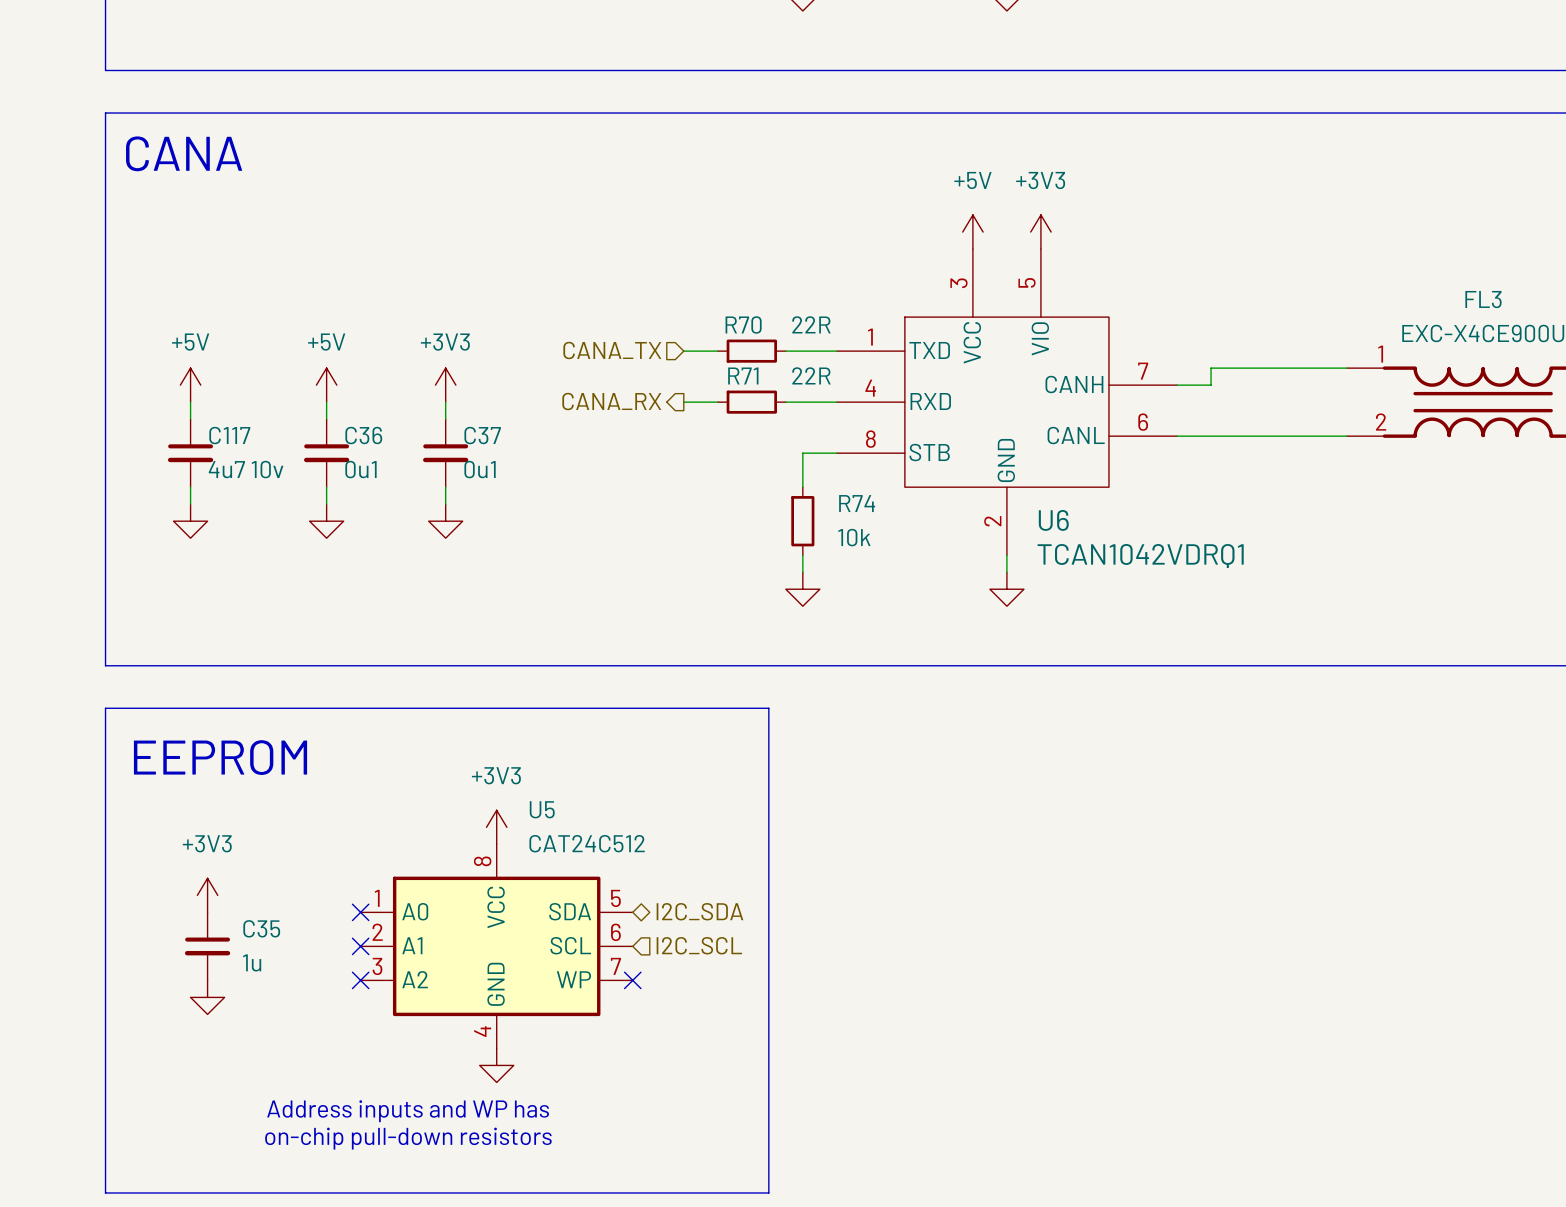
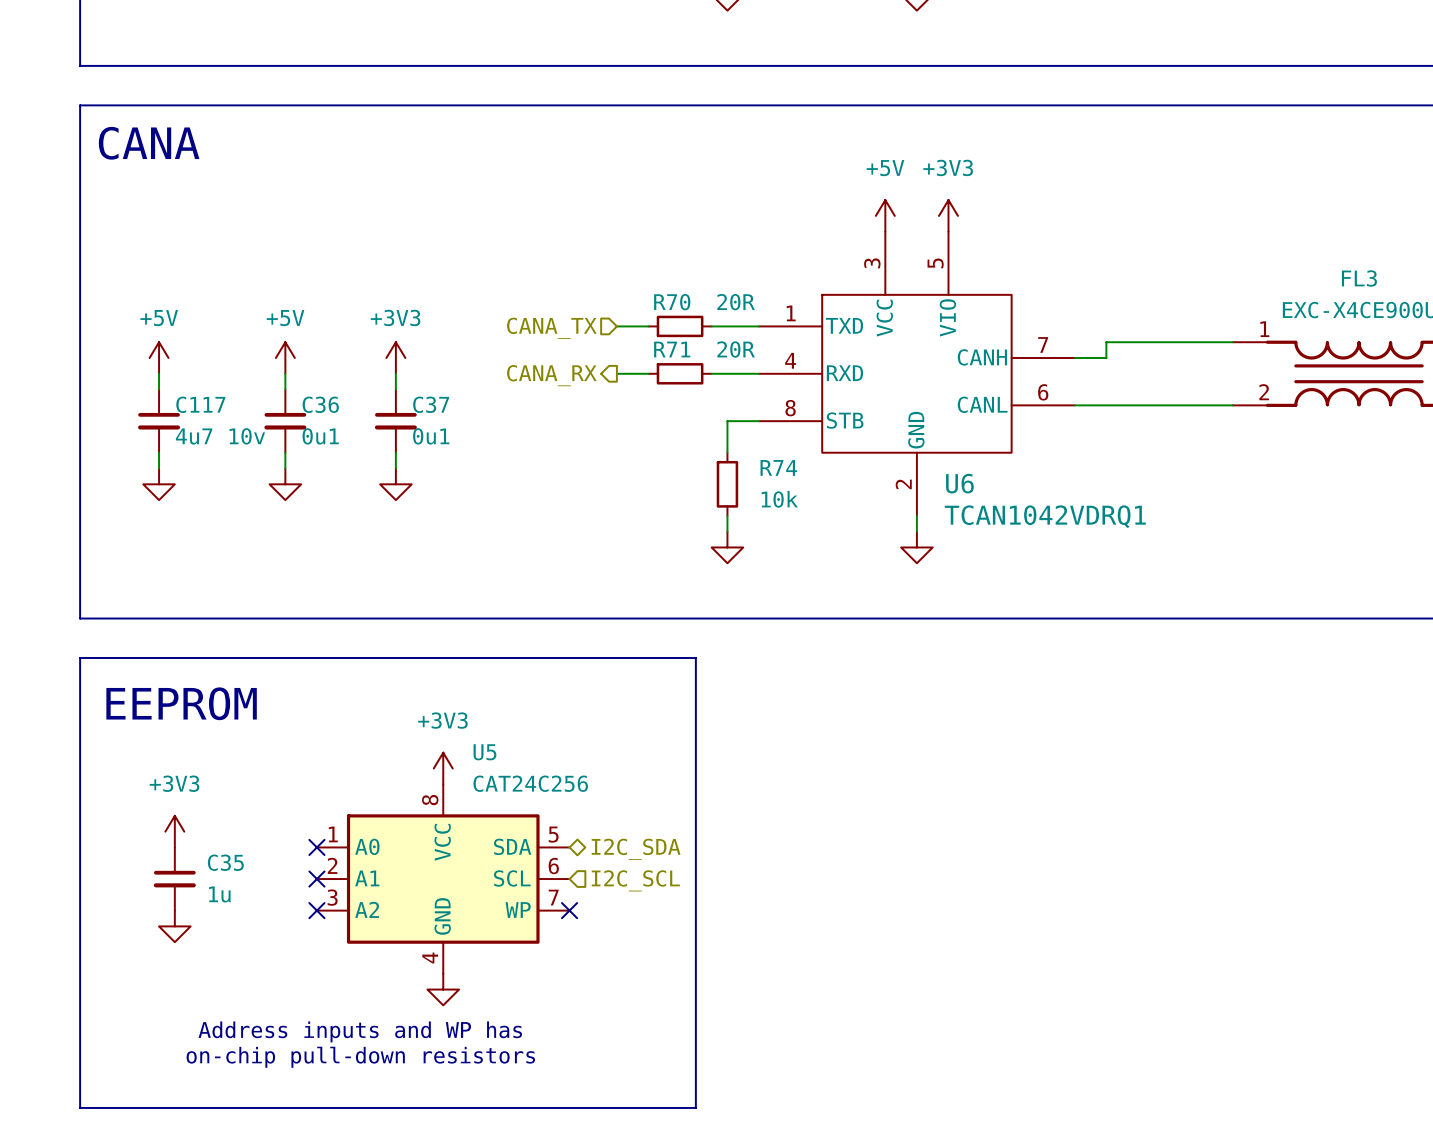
R70 value: 22R (811, 324) -> 20R (736, 302)
R71 value: 22R (811, 375) -> 20R (736, 349)
U5 value: CAT24C512 (587, 843) -> CAT24C256 (530, 783)

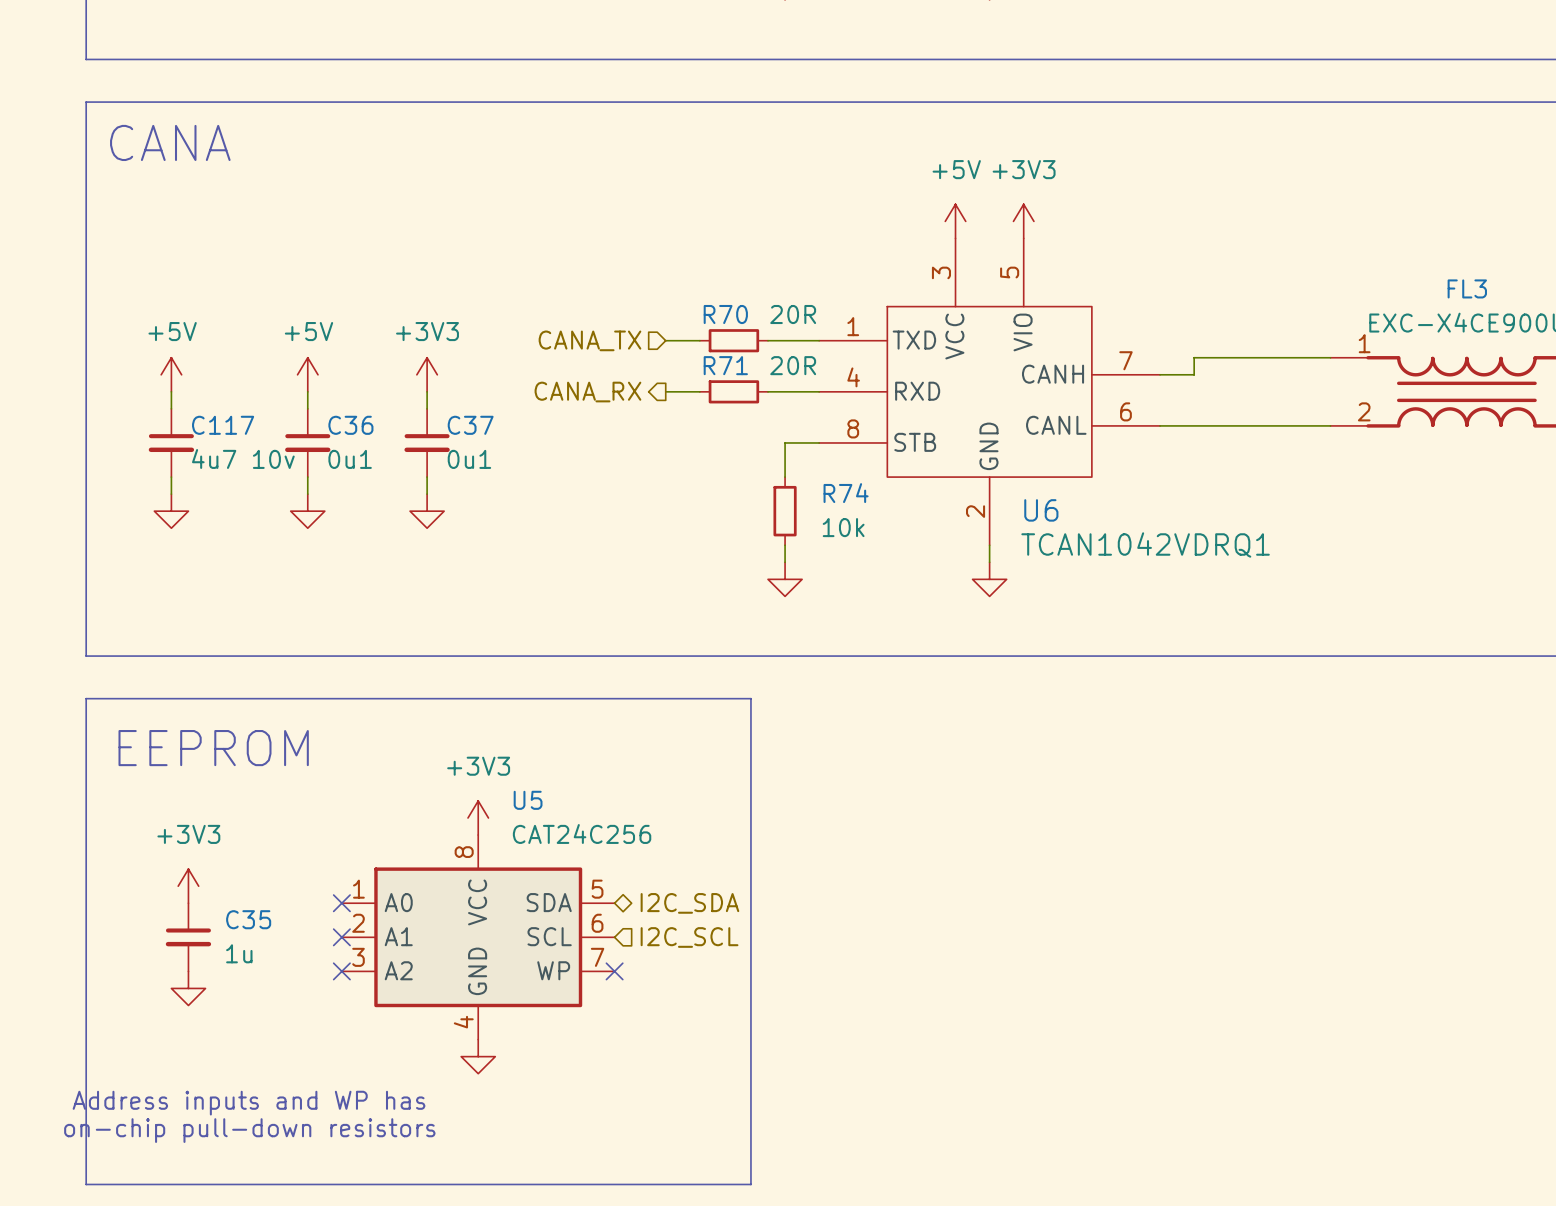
text position: Address inputs and WP has (360, 1031) -> Address inputs and WP has (249, 1103)
text position: on-chip pull-down resistors (360, 1057) -> on-chip pull-down resistors (249, 1130)

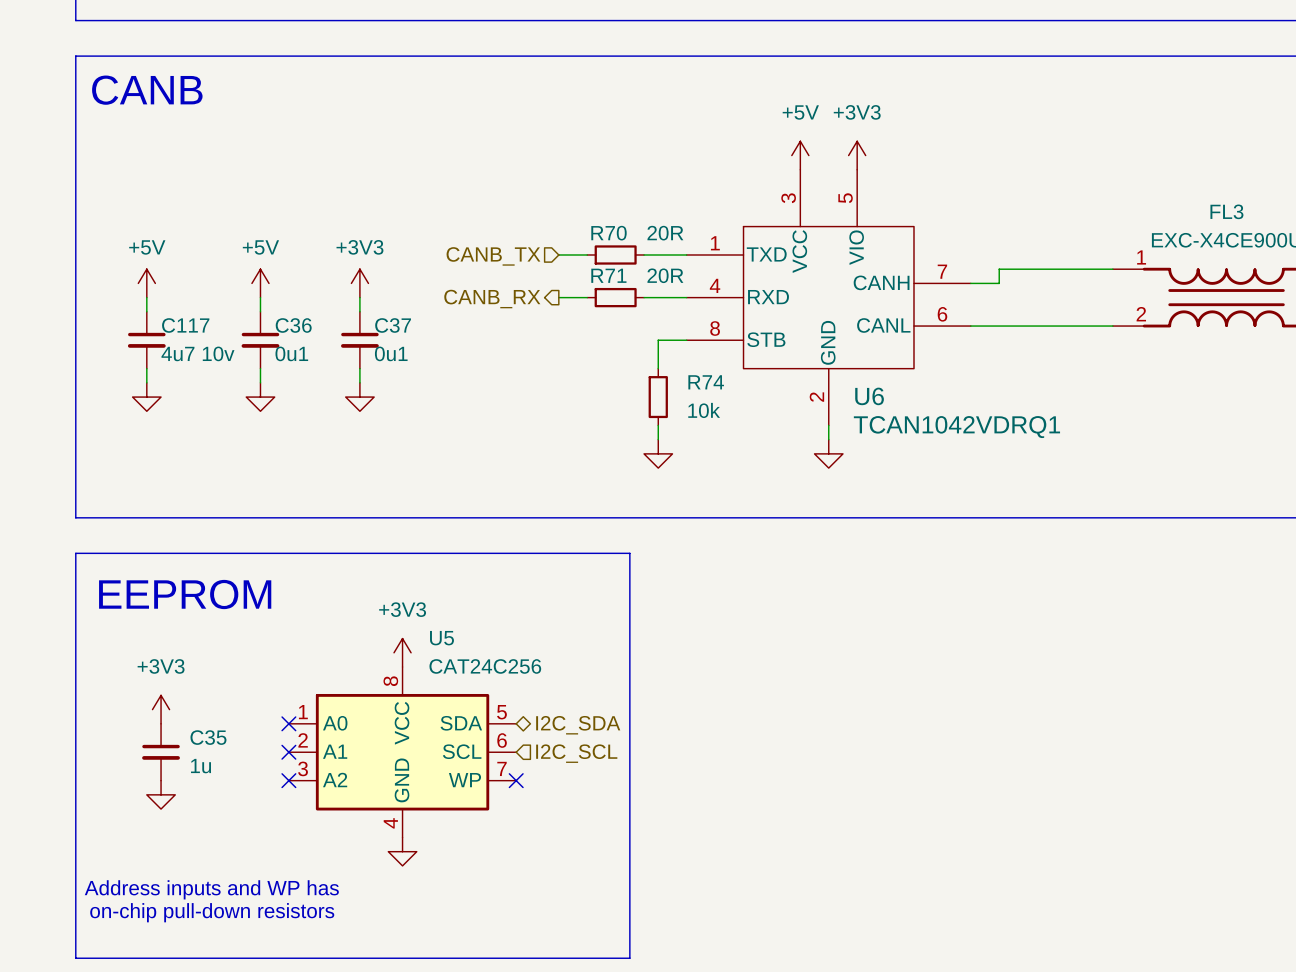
text: CANA (170, 142) -> CANB (147, 90)
hierarchical label: CANA_TX (589, 340) -> CANB_TX (493, 256)
hierarchical label: CANA_RX (587, 392) -> CANB_RX (492, 299)

